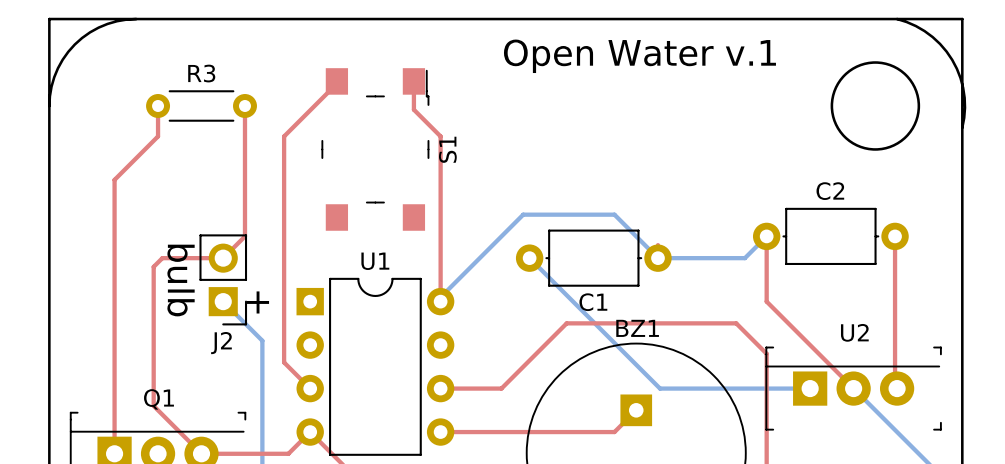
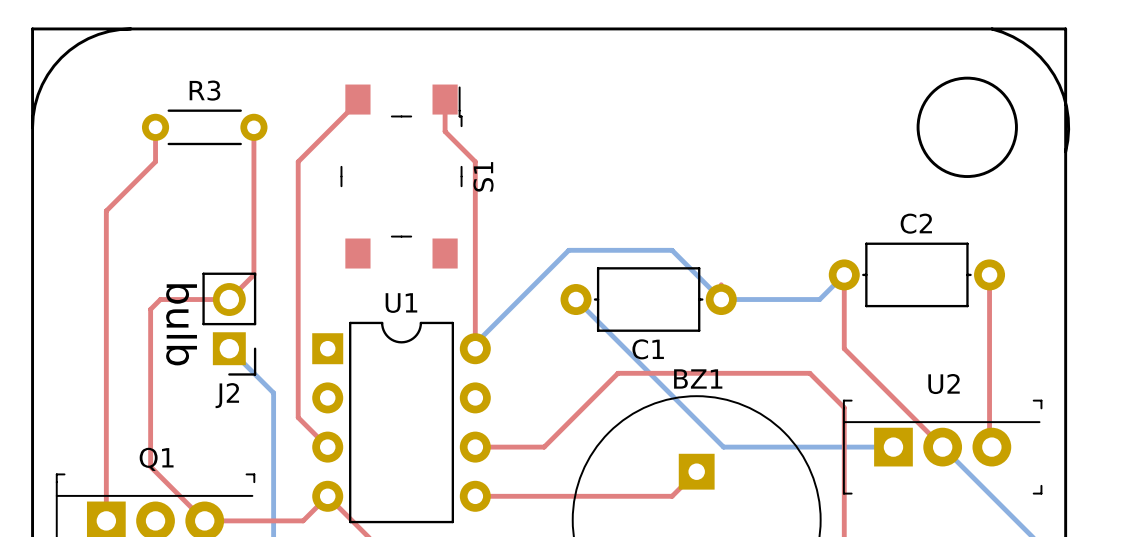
text: Open Water v.1 (639, 56) -> none
text: + (258, 302) -> none

